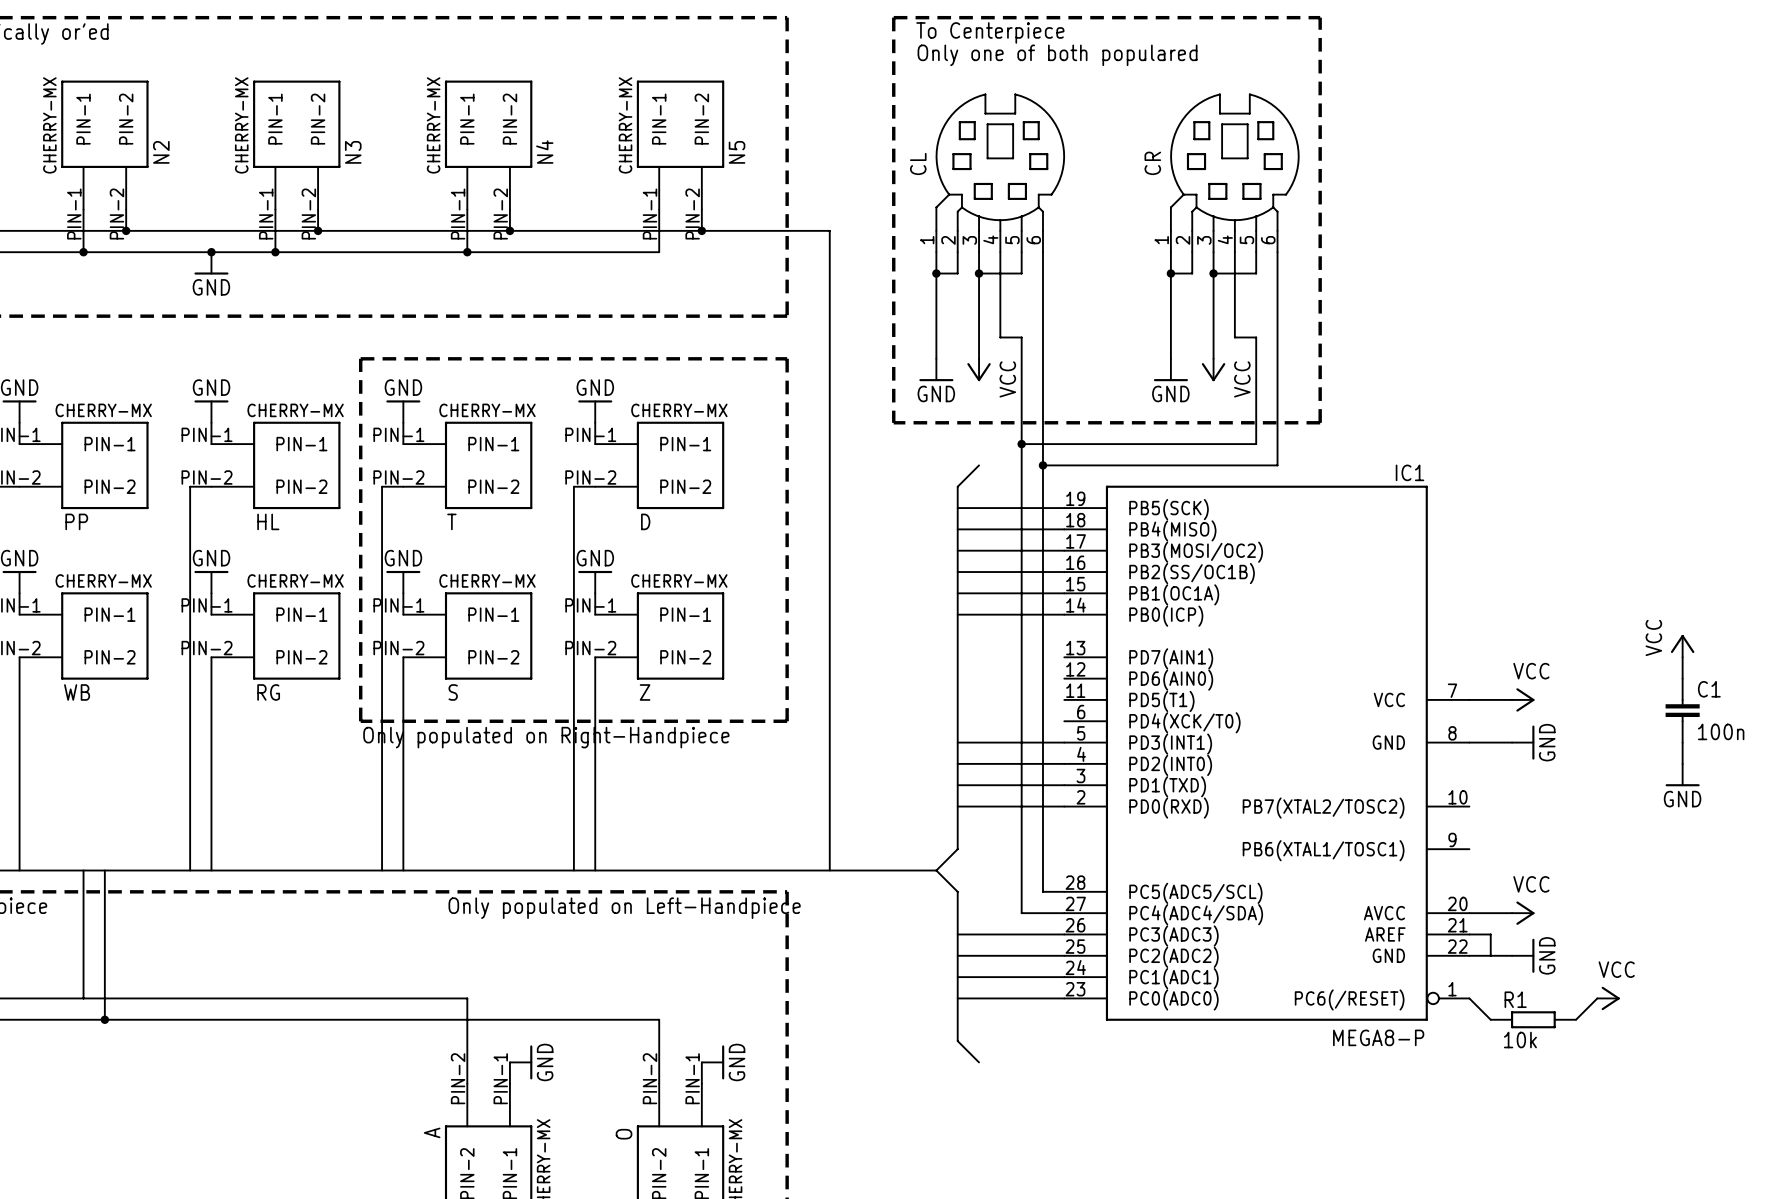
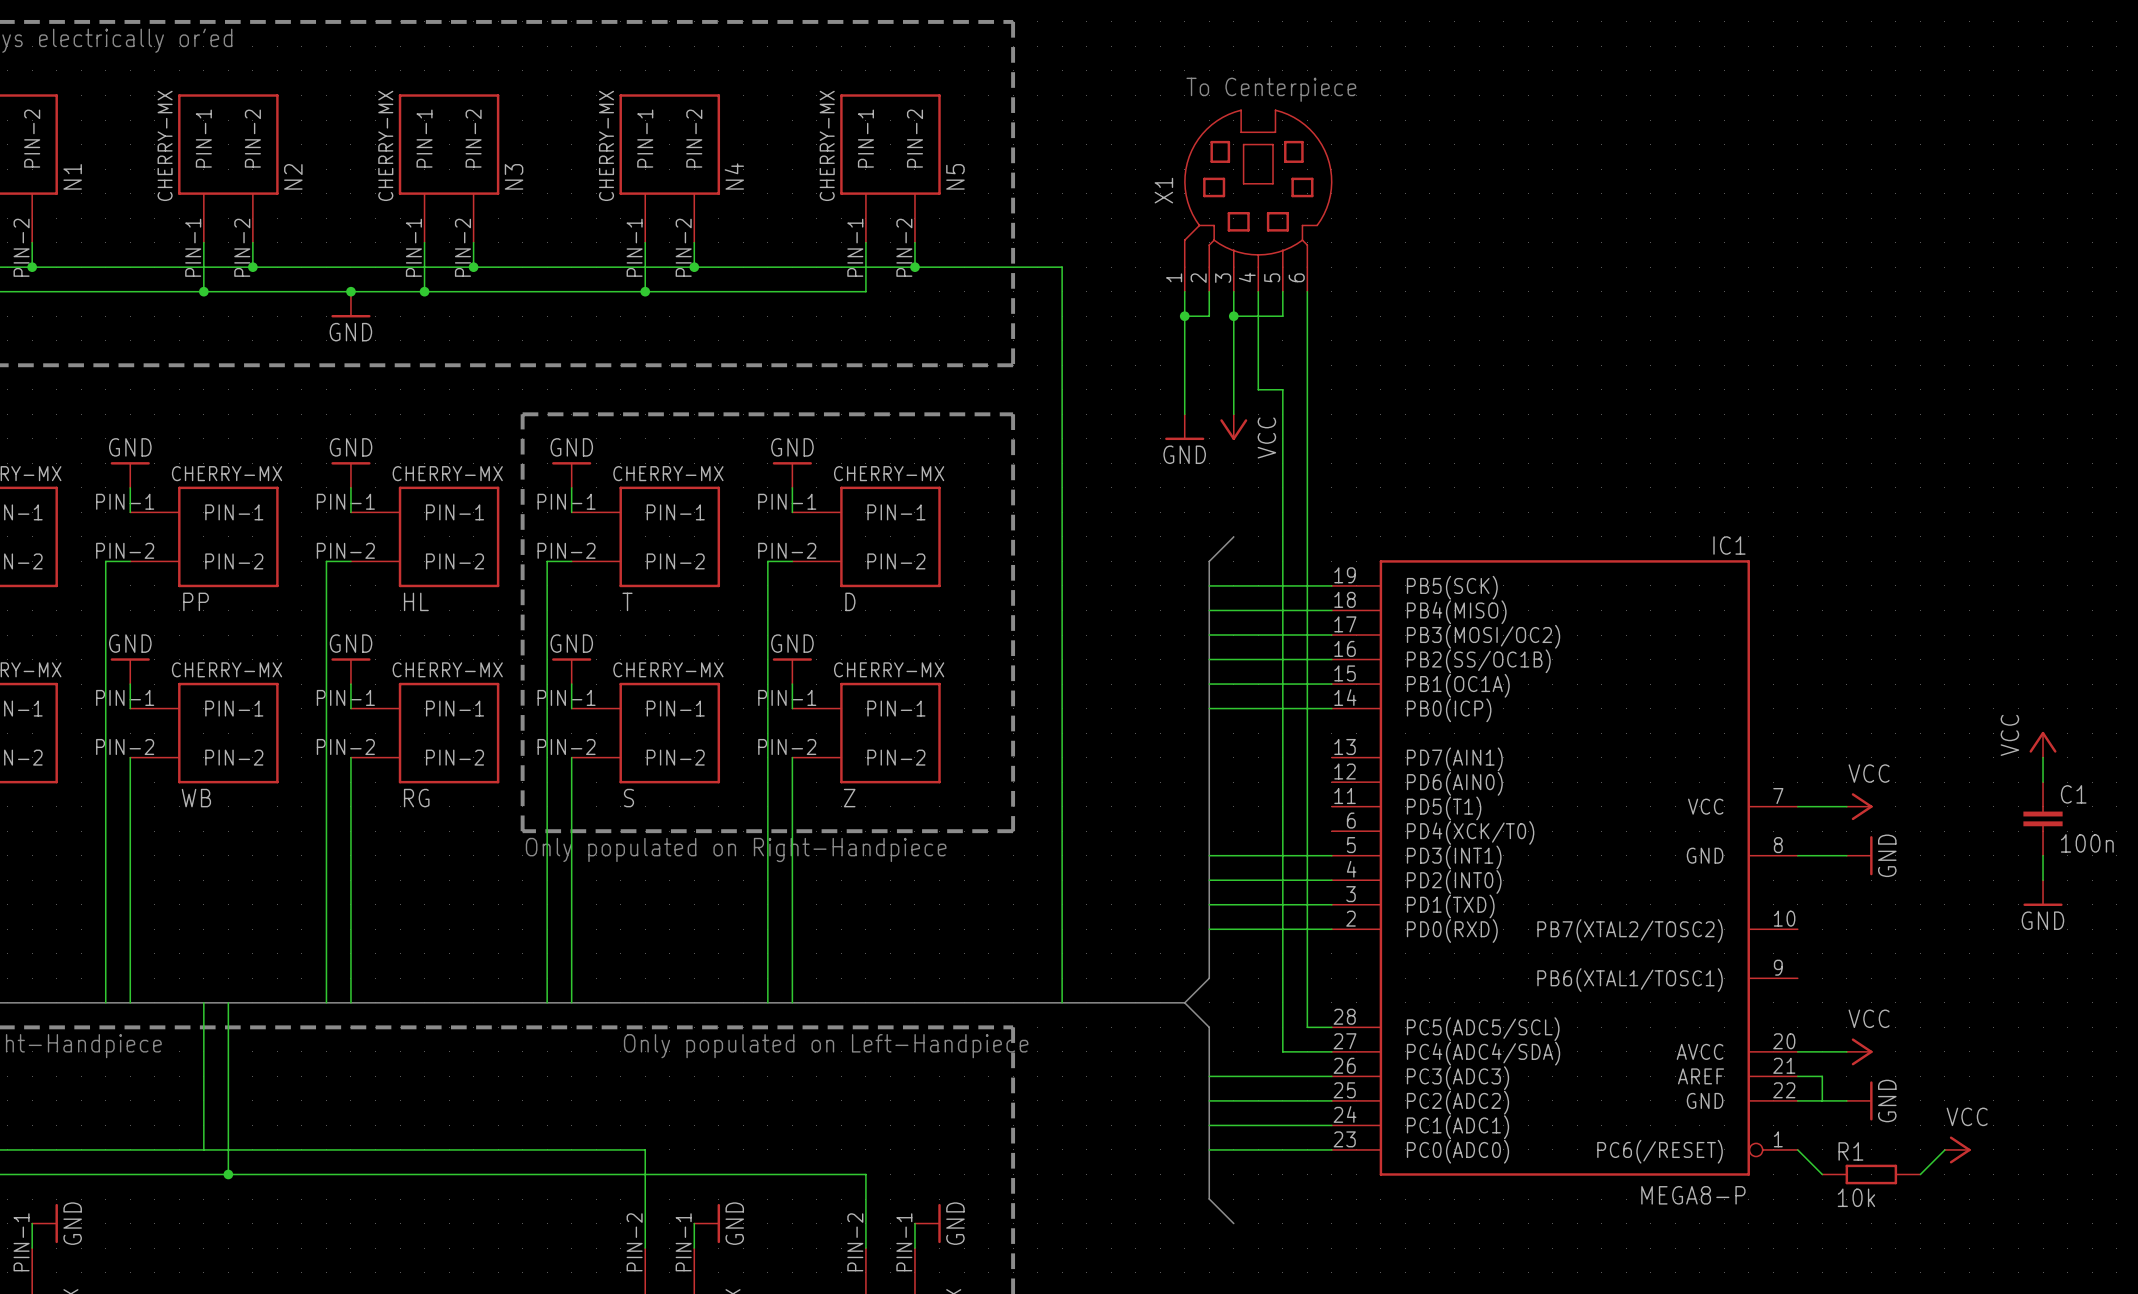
line: (893, 17) (1320, 17) (1320, 422) (893, 422) (893, 17) -> none
text position: To Centerpiece (990, 32) -> To Centerpiece (1271, 89)
text: Only one of both populared (1057, 55) -> none
CL name: CL (918, 163) -> X1 (1163, 190)
CR: (1234, 173) -> none
wire: (1170, 252) (1170, 358) -> none
wire: (1192, 252) (1192, 273) (1170, 273) -> none
wire: (1213, 252) (1213, 358) -> none
wire: (1234, 252) (1234, 337) (1256, 337) (1256, 444) (1021, 444) -> none
wire: (1256, 252) (1256, 273) (1213, 273) -> none
wire: (1277, 252) (1277, 465) (1042, 465) -> none
junction: (1170, 273) -> none
junction: (1213, 273) -> none
power symbol: GND (1170, 370) -> none
power symbol: VCC (1213, 370) -> none
junction: (1021, 444) -> none
junction: (1042, 465) -> none

